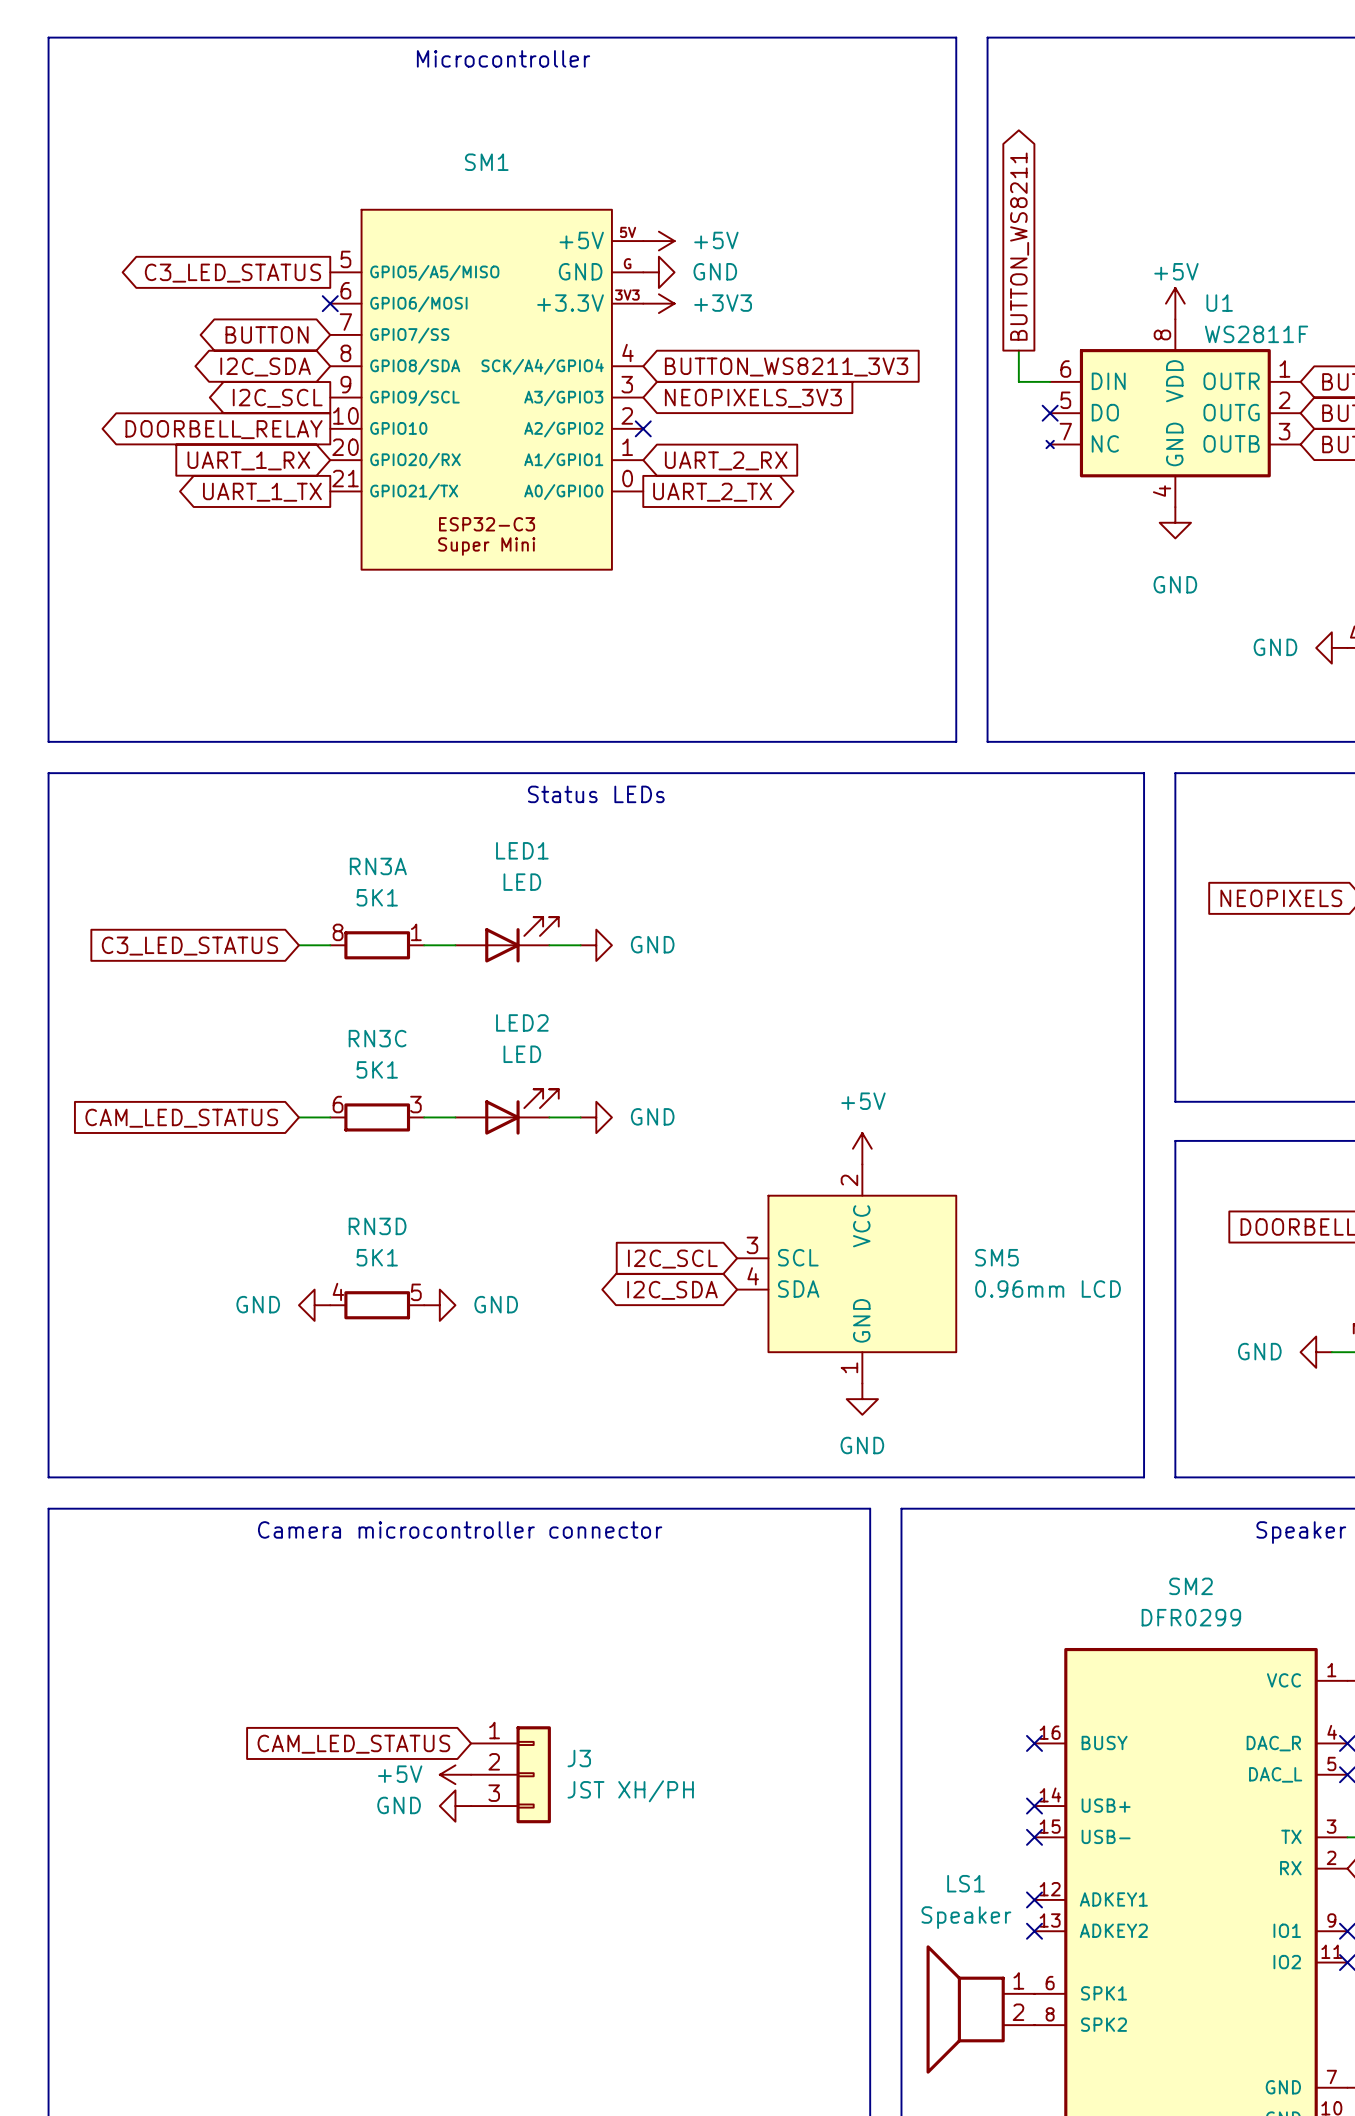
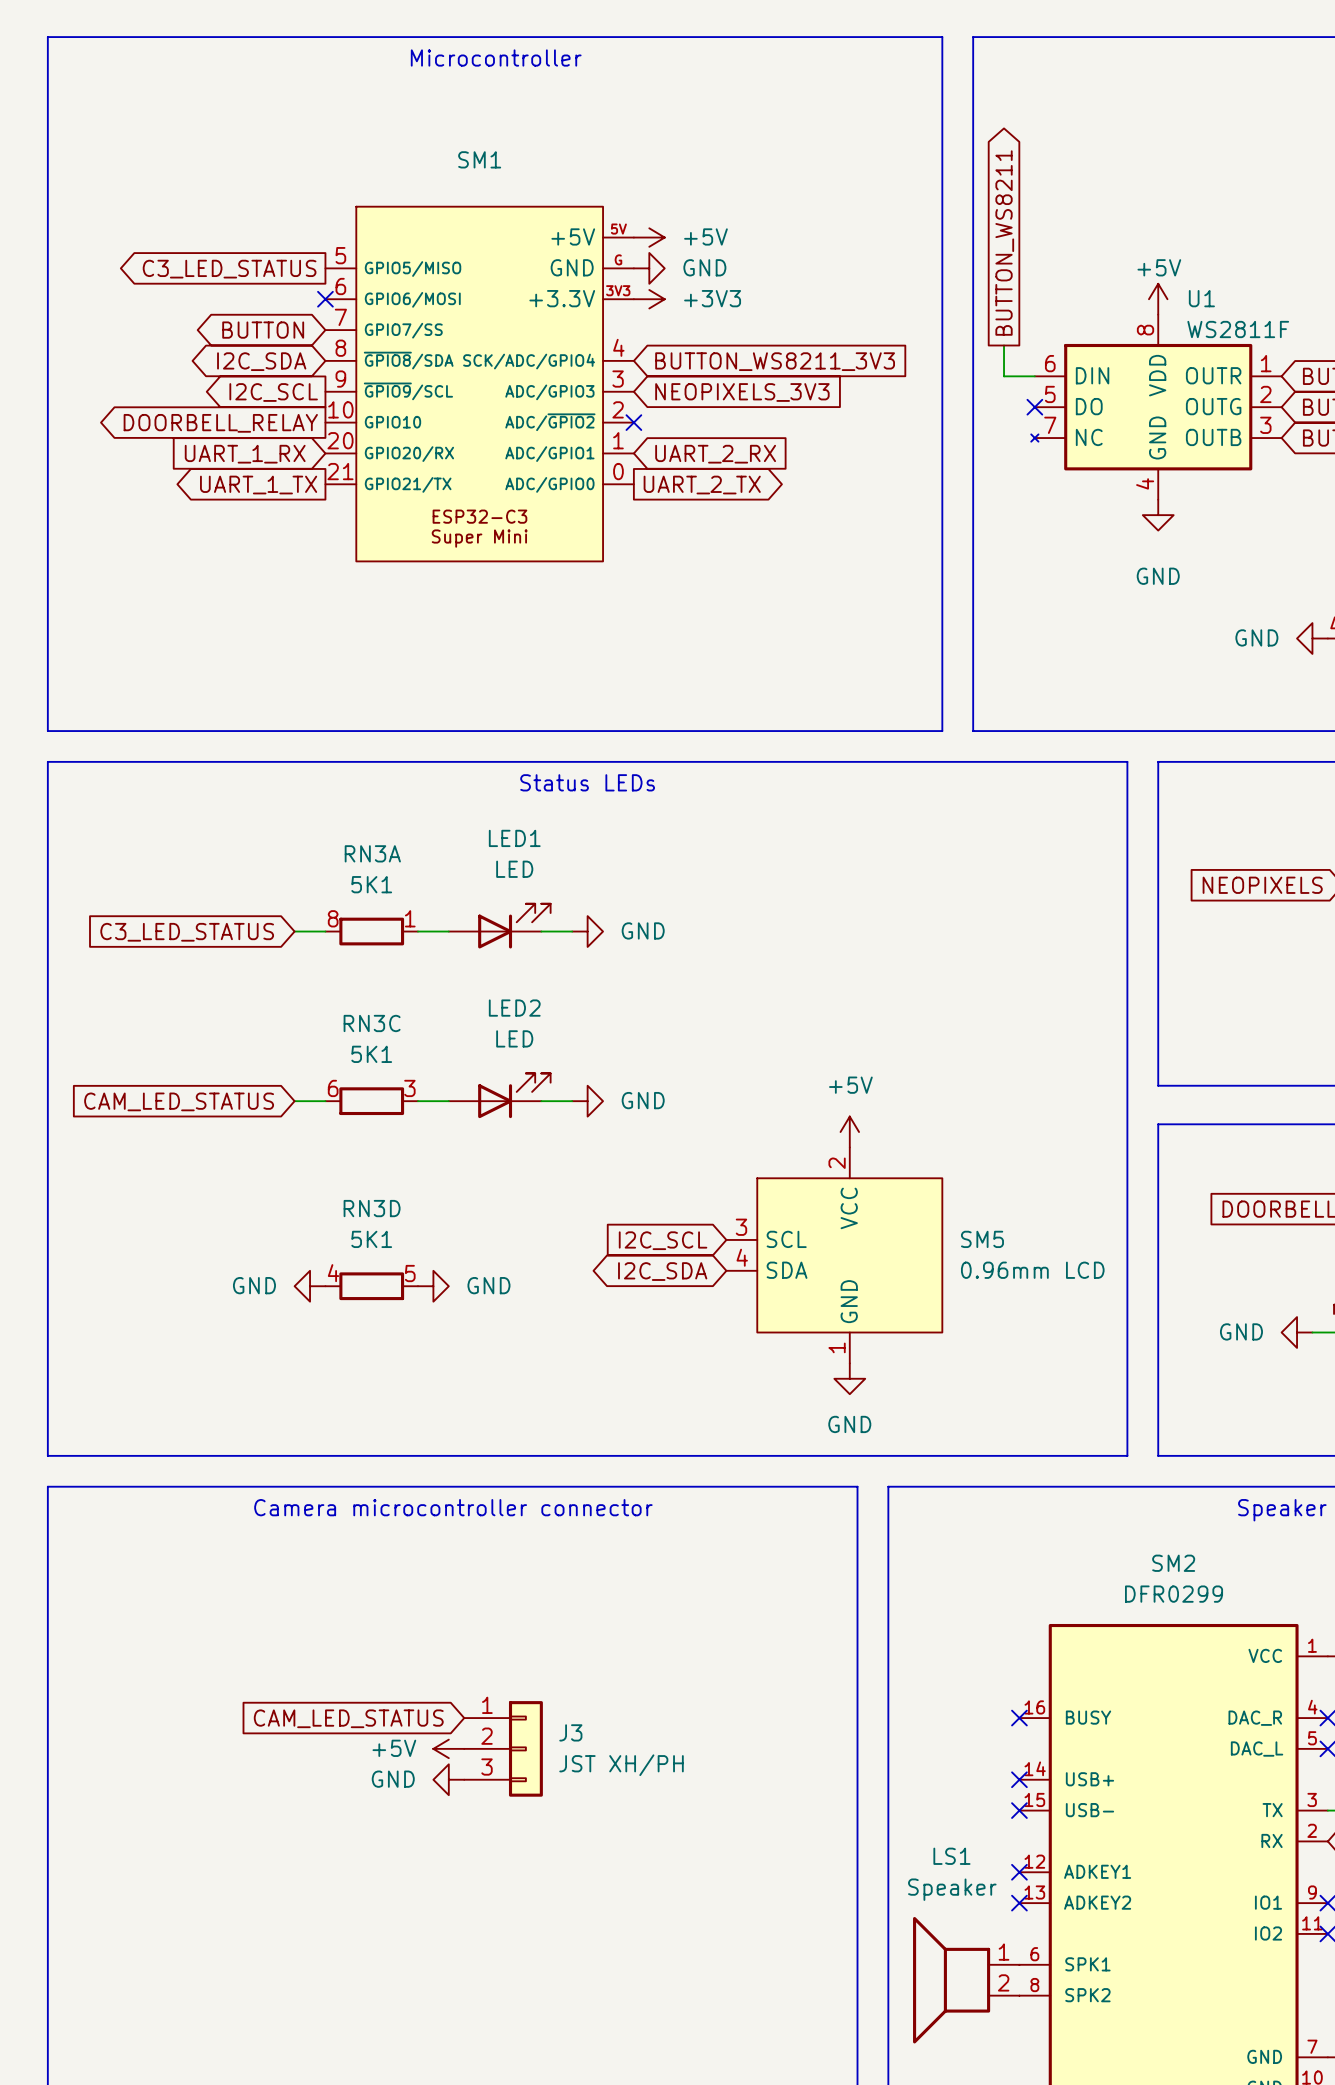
SM1 pin name: GPIO5/A5/MISO (434, 272) -> GPIO5/MISO (413, 269)
SM1 pin name: GPIO8/SDA (415, 366) -> ~{GPIO8}/SDA (408, 360)
SM1 pin name: SCK/A4/GPIO4 (542, 366) -> SCK/ADC/GPIO4 (529, 361)
SM1 pin name: GPIO9/SCL (414, 398) -> ~{GPIO9}/SCL (408, 391)
SM1 pin name: A3/GPIO3 (563, 398) -> ADC/GPIO3 (549, 392)
SM1 pin name: A2/GPIO2 (563, 429) -> ADC/~{GPIO2} (550, 422)
SM1 pin name: A1/GPIO1 (563, 460) -> ADC/GPIO1 (549, 454)
SM1 pin name: A0/GPIO0 (563, 492) -> ADC/GPIO0 (549, 484)

